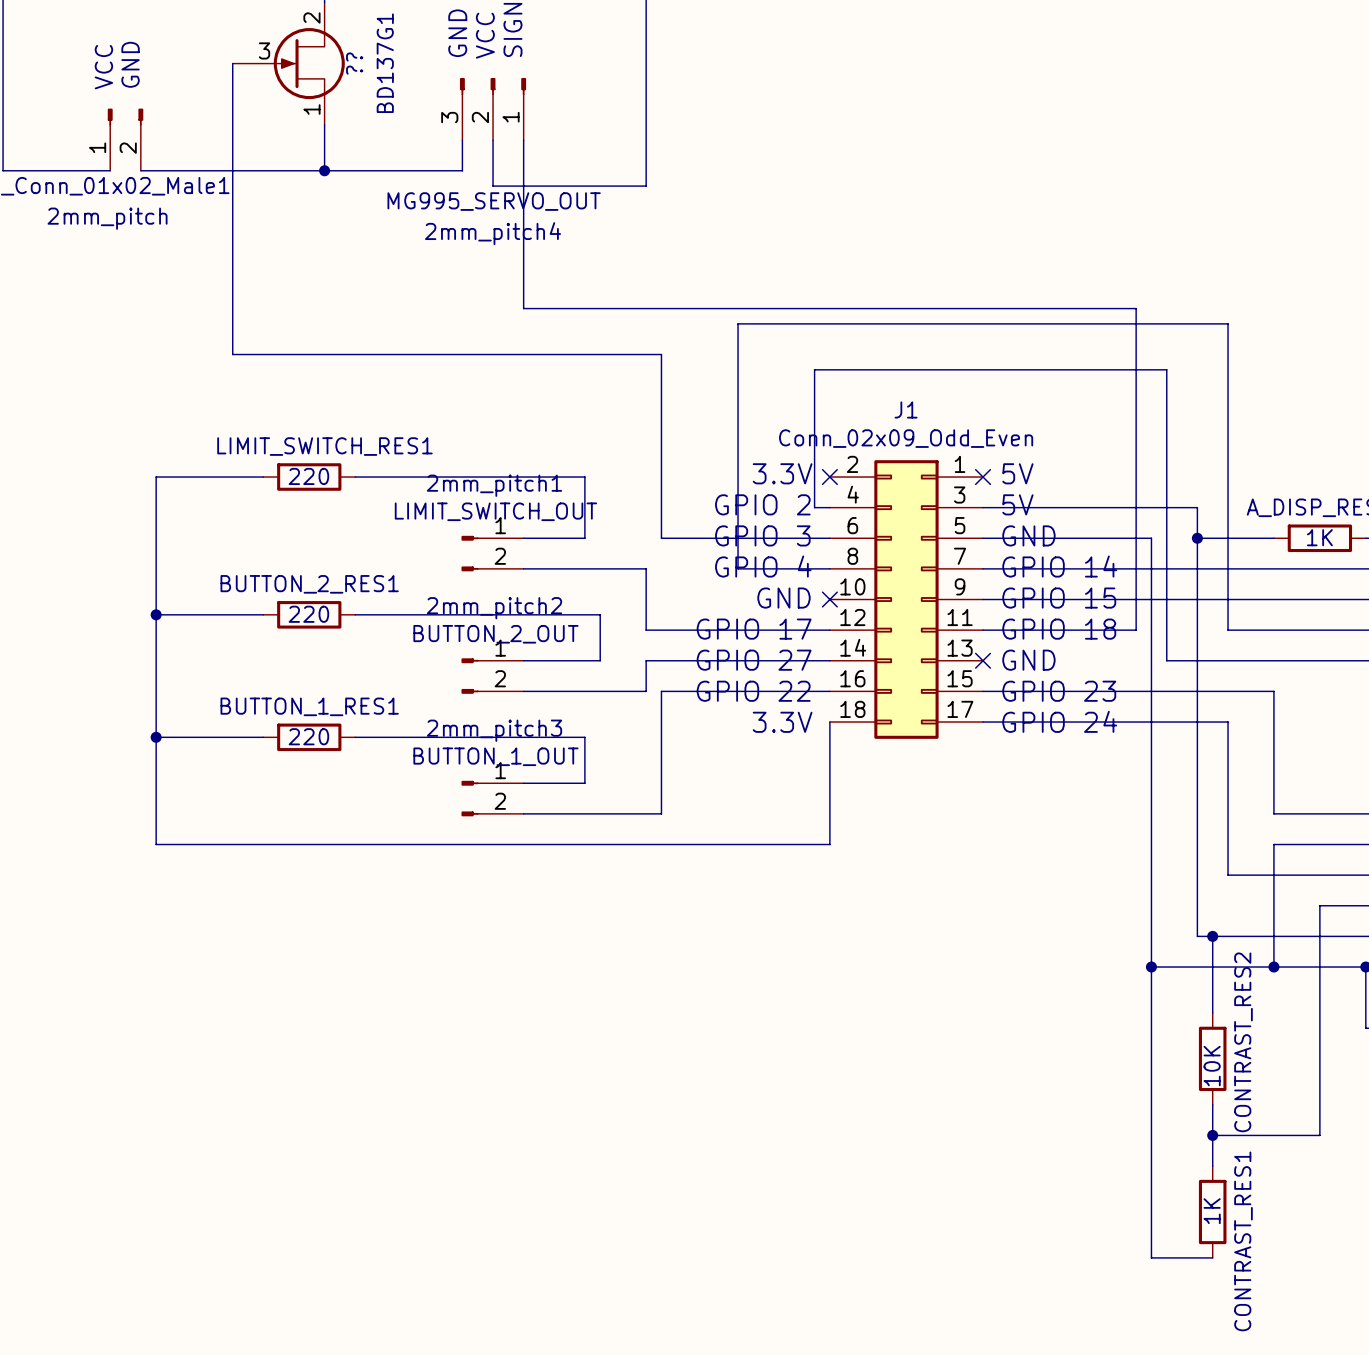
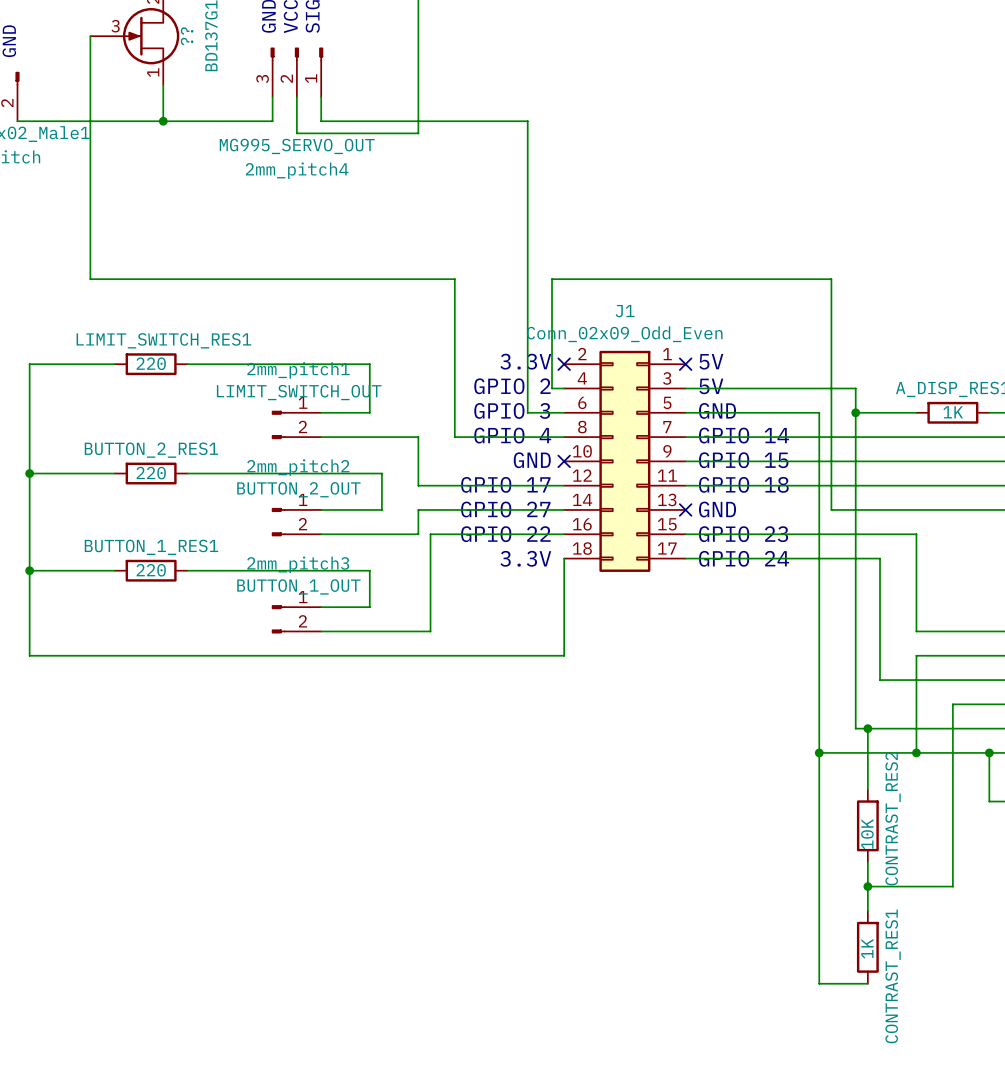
wire: (523, 170) (523, 308) (1136, 308) (1136, 630) -> (321, 121) (527, 121) (527, 412)
wire: (232, 354) (661, 354) (661, 538) (783, 538) -> (90, 267) (90, 279) (454, 279) (454, 437) (491, 437)
wire: (738, 568) (738, 323) (1228, 323) (1228, 630) -> (807, 485) (880, 485)

